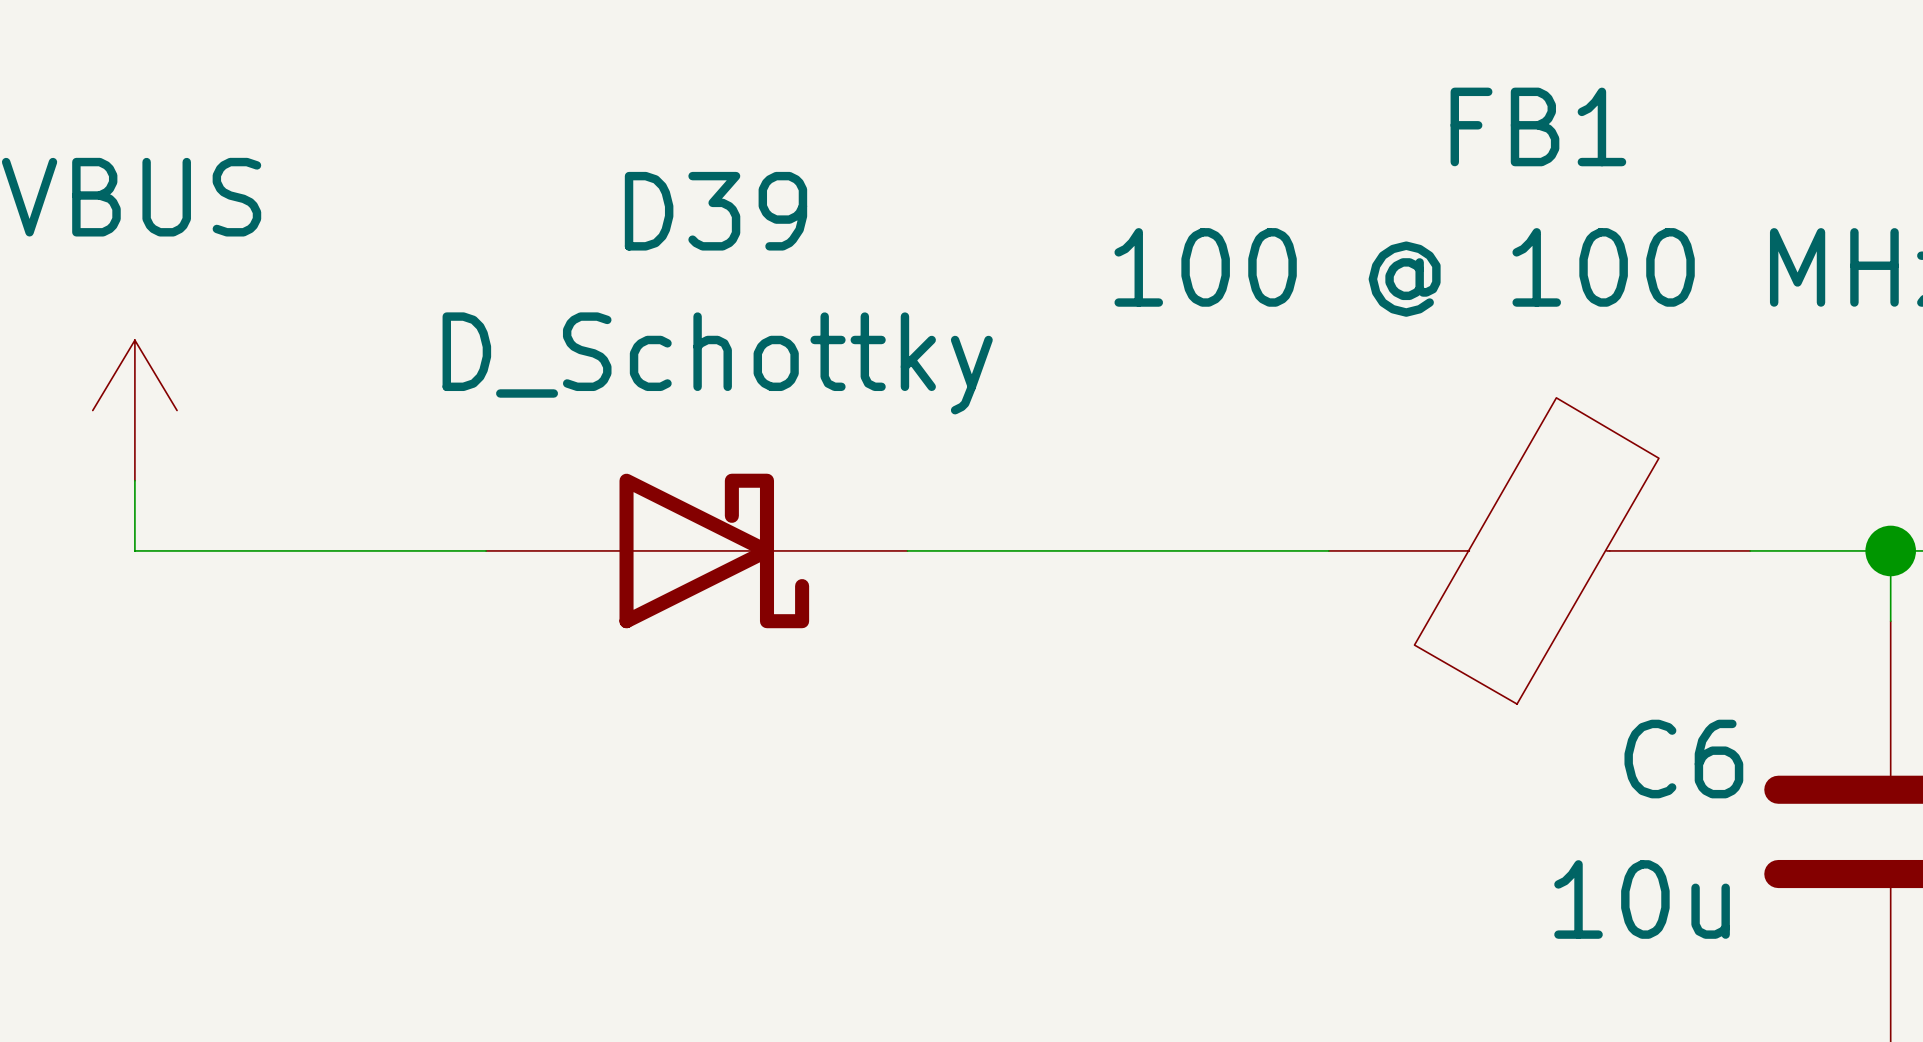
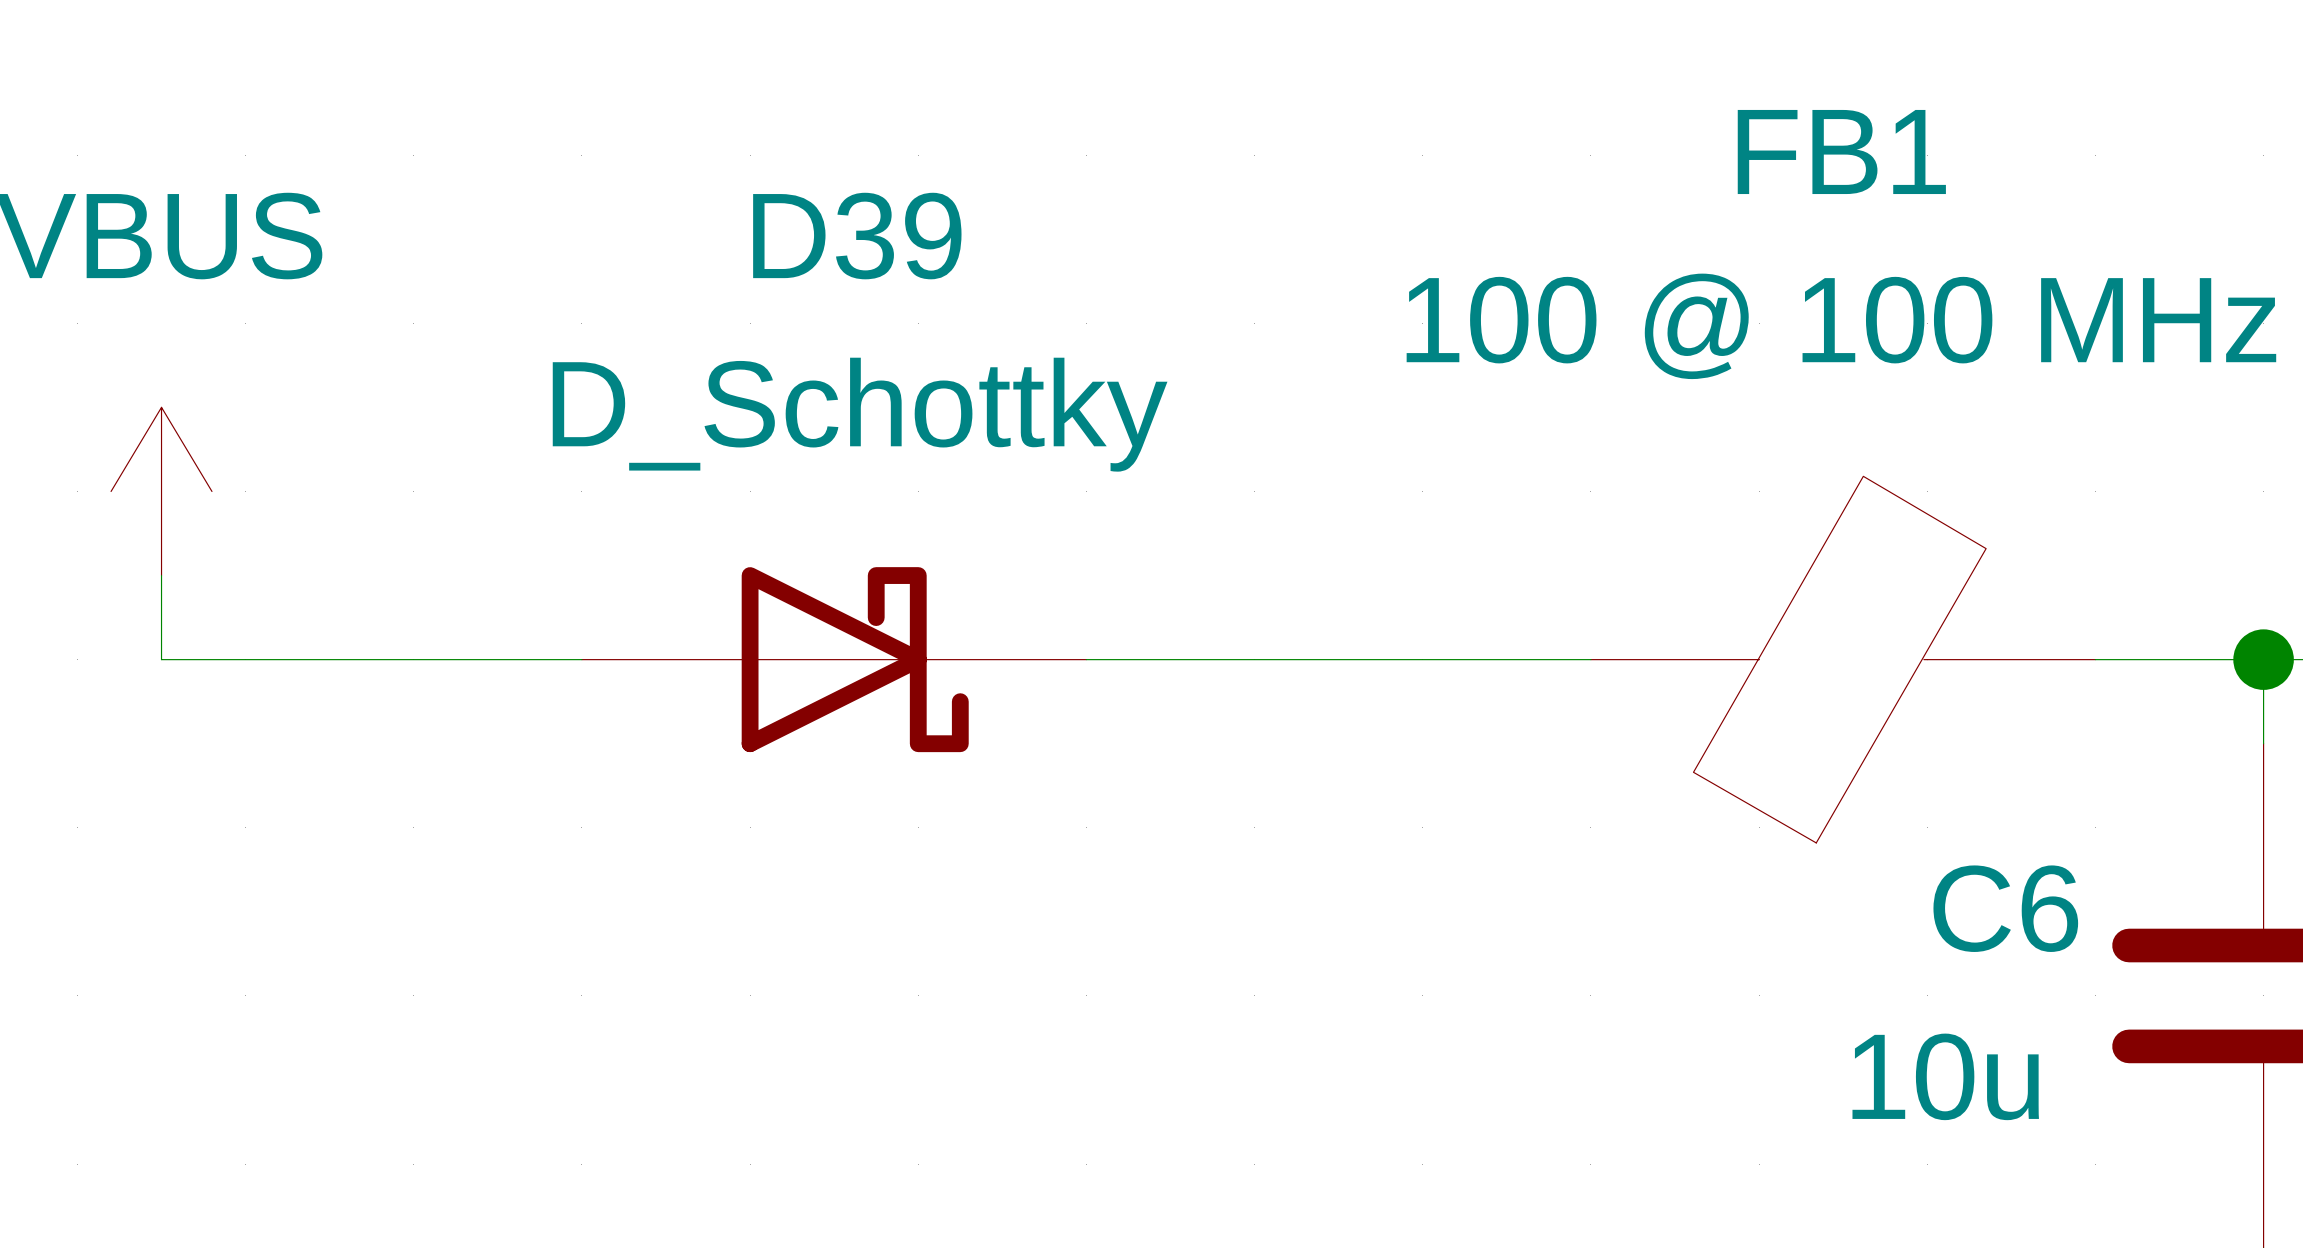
D39 name position: D39 (715, 211) -> D39 (857, 236)
D39 value position: D_Schottky (717, 363) -> D_Schottky (860, 414)

